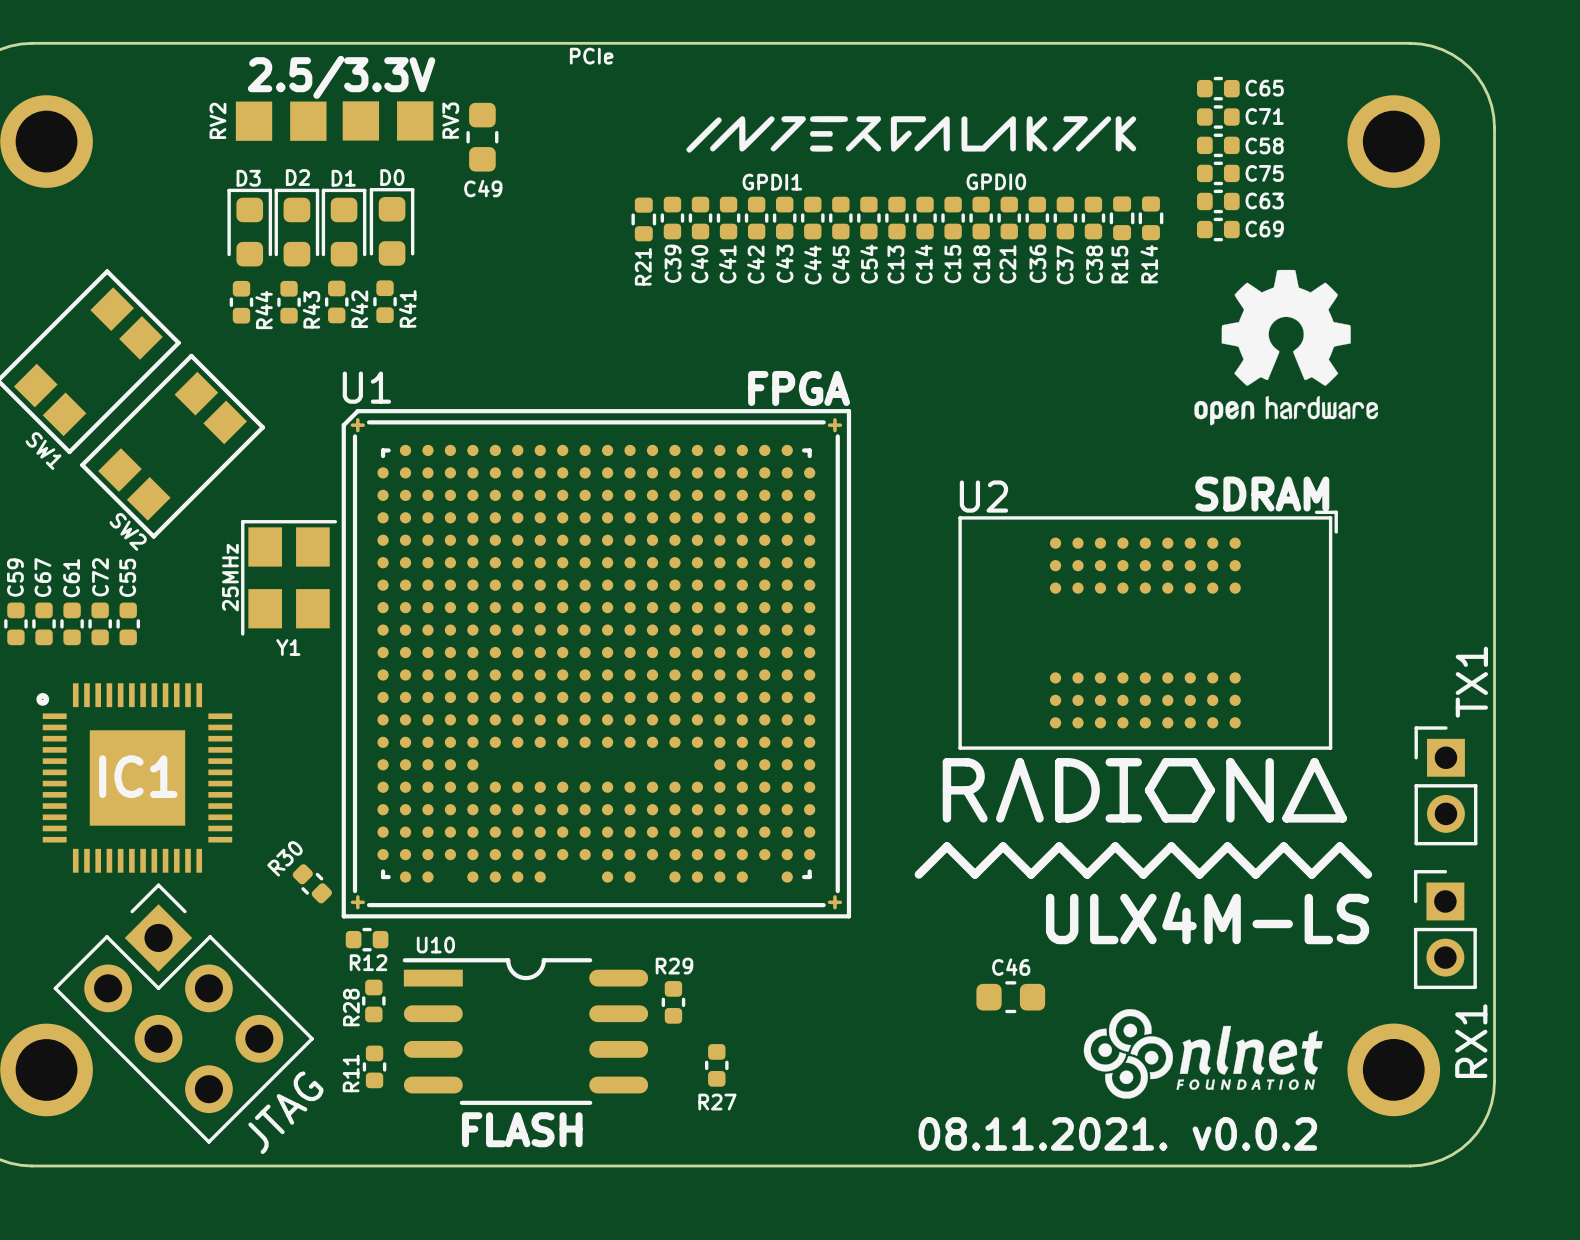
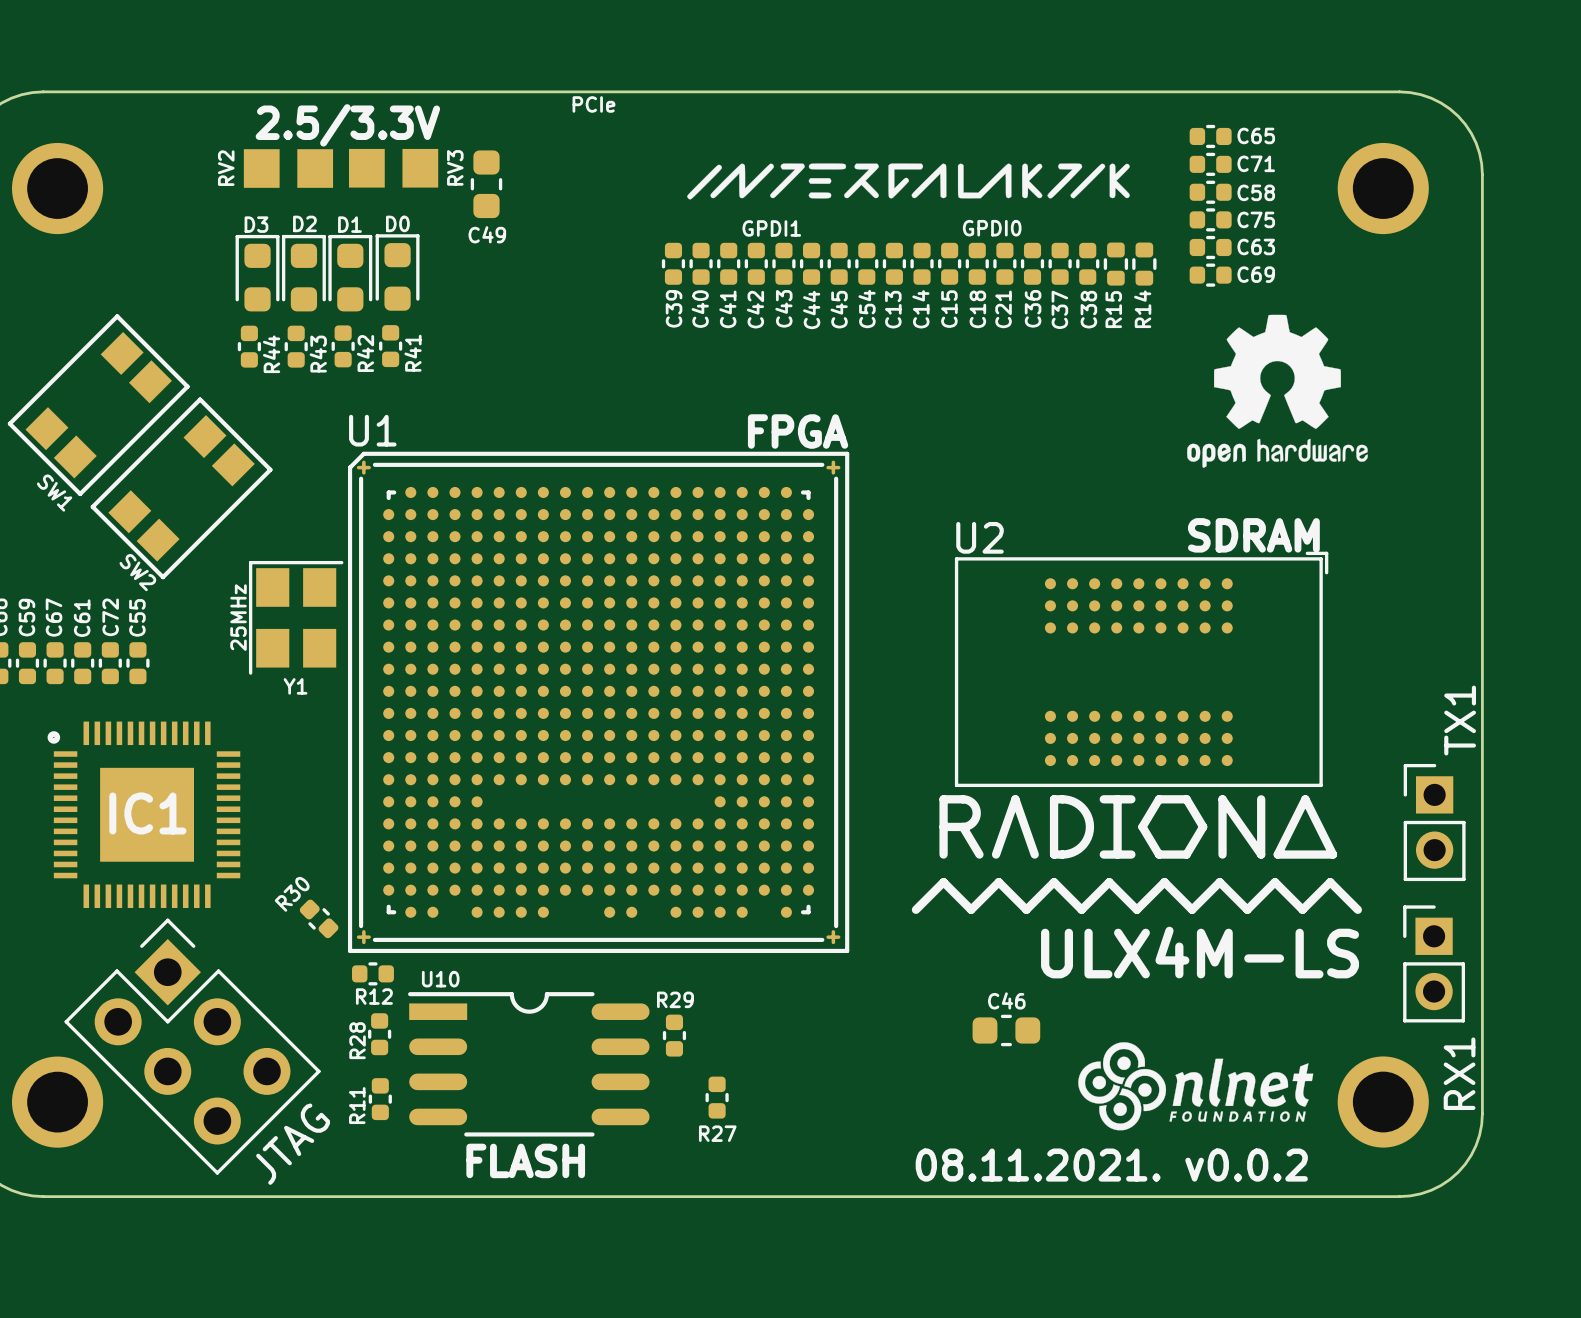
R21: (643, 219) -> none

